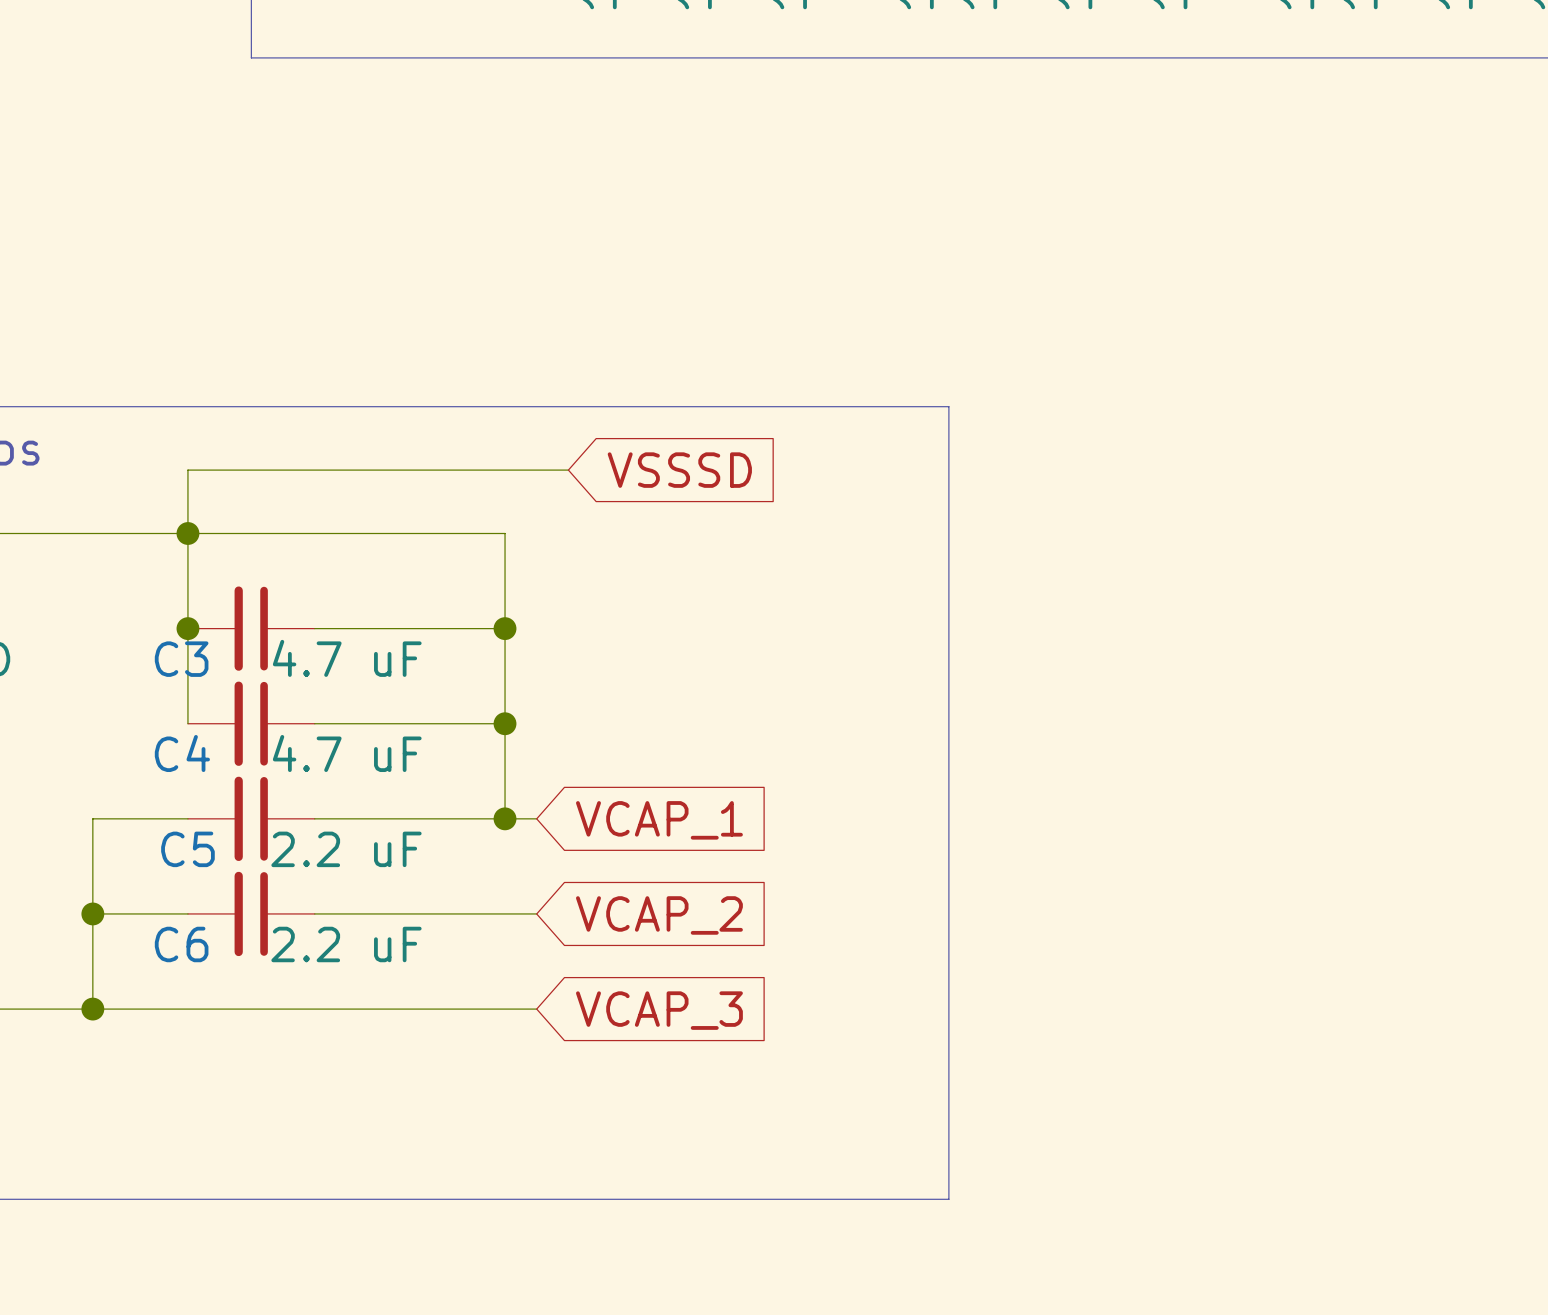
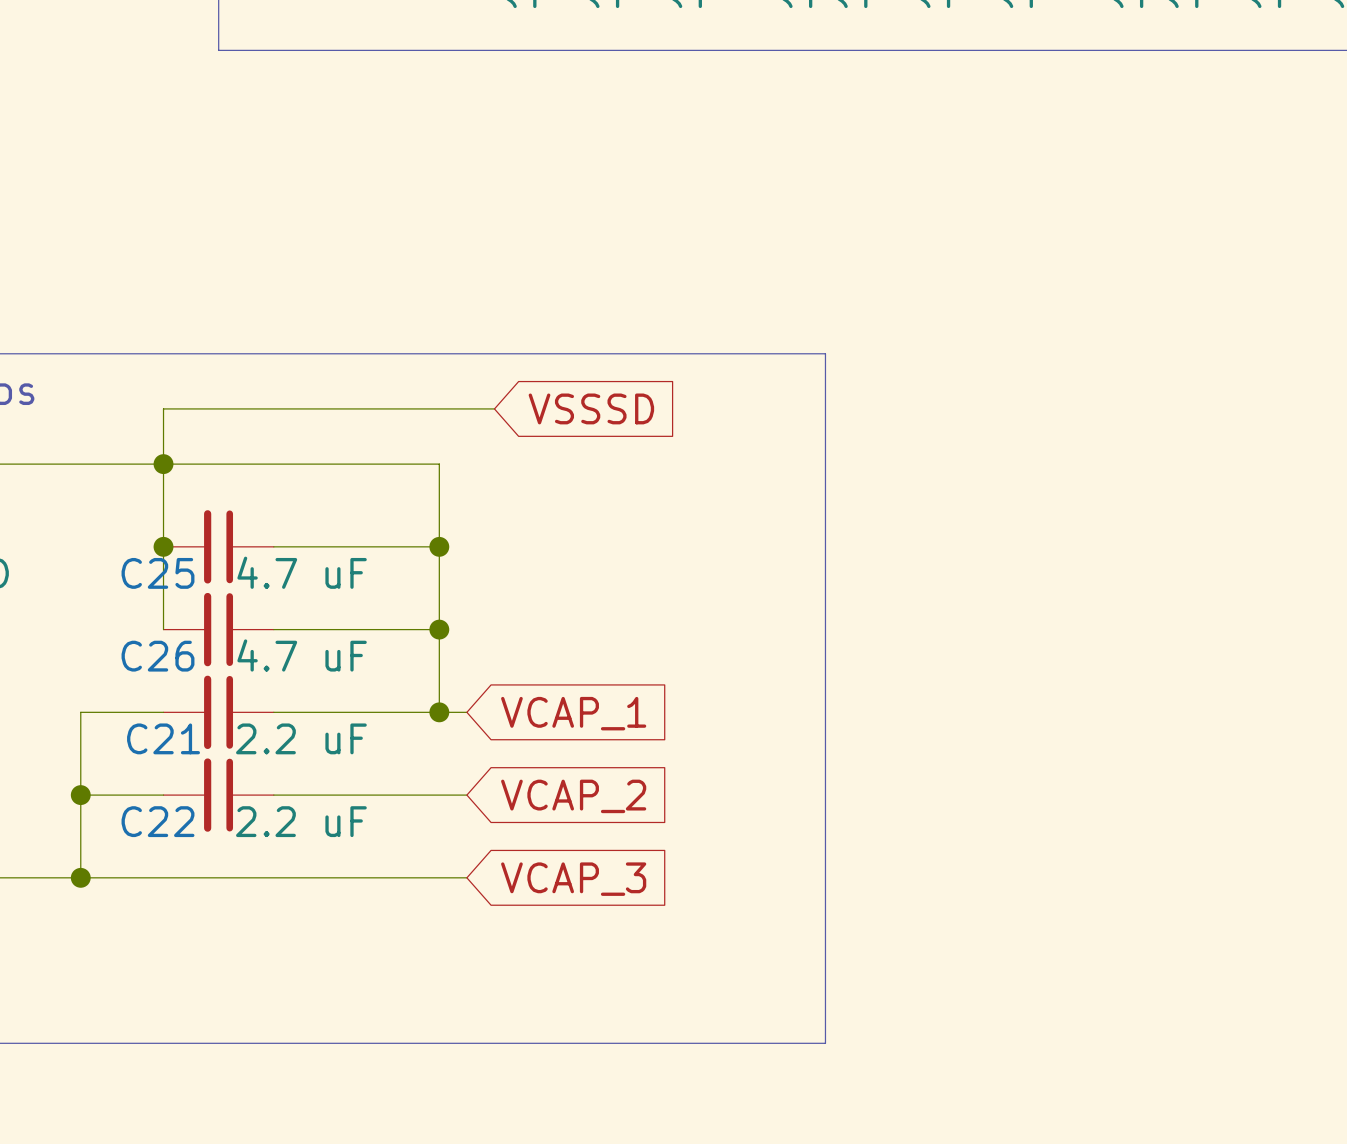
C3 name: C3 (181, 659) -> C25 (158, 573)
C4 name: C4 (182, 753) -> C26 (158, 656)
C5 name: C5 (187, 849) -> C21 (163, 738)
C6 name: C6 (181, 944) -> C22 (158, 821)

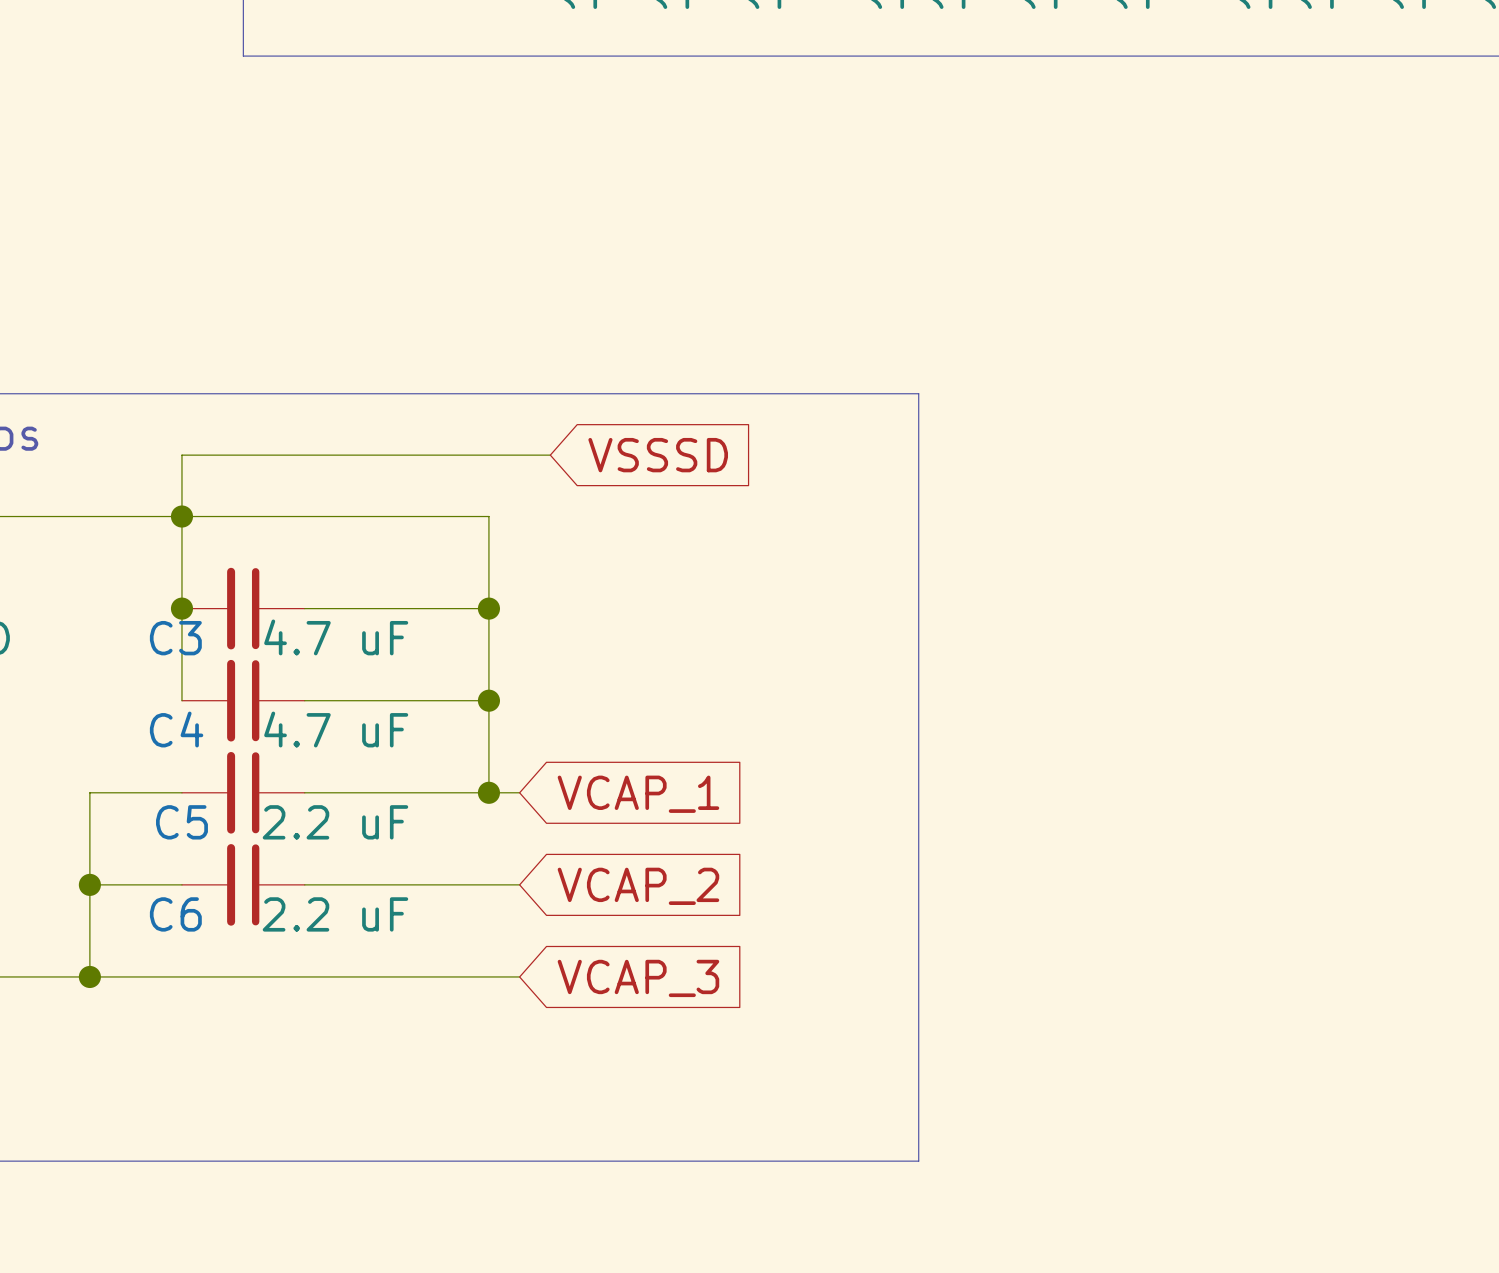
C25 name: C25 (158, 573) -> C3 (175, 638)
C26 name: C26 (158, 656) -> C4 (176, 729)
C21 name: C21 (163, 738) -> C5 (181, 822)
C22 name: C22 (158, 821) -> C6 (175, 914)

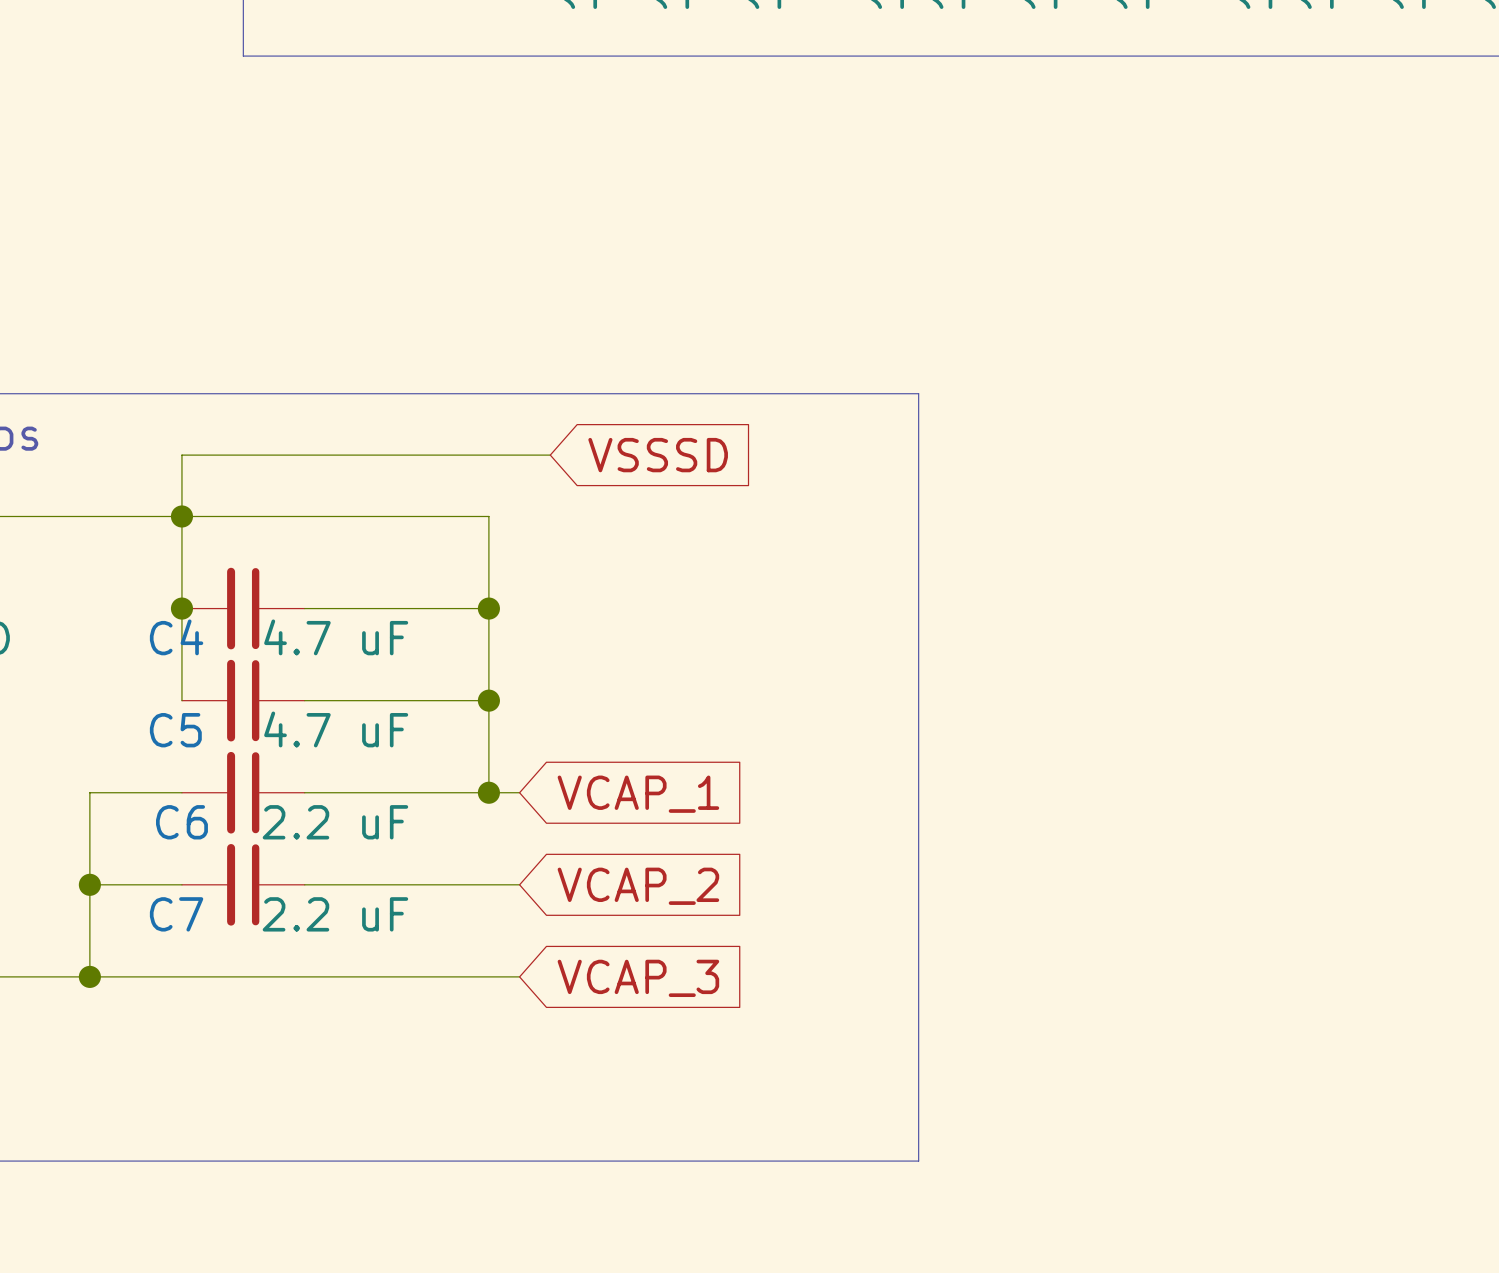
C3 name: C3 (175, 638) -> C4 (176, 637)
C4 name: C4 (176, 729) -> C5 (175, 730)
C5 name: C5 (181, 822) -> C6 (181, 822)
C6 name: C6 (175, 914) -> C7 (176, 914)

